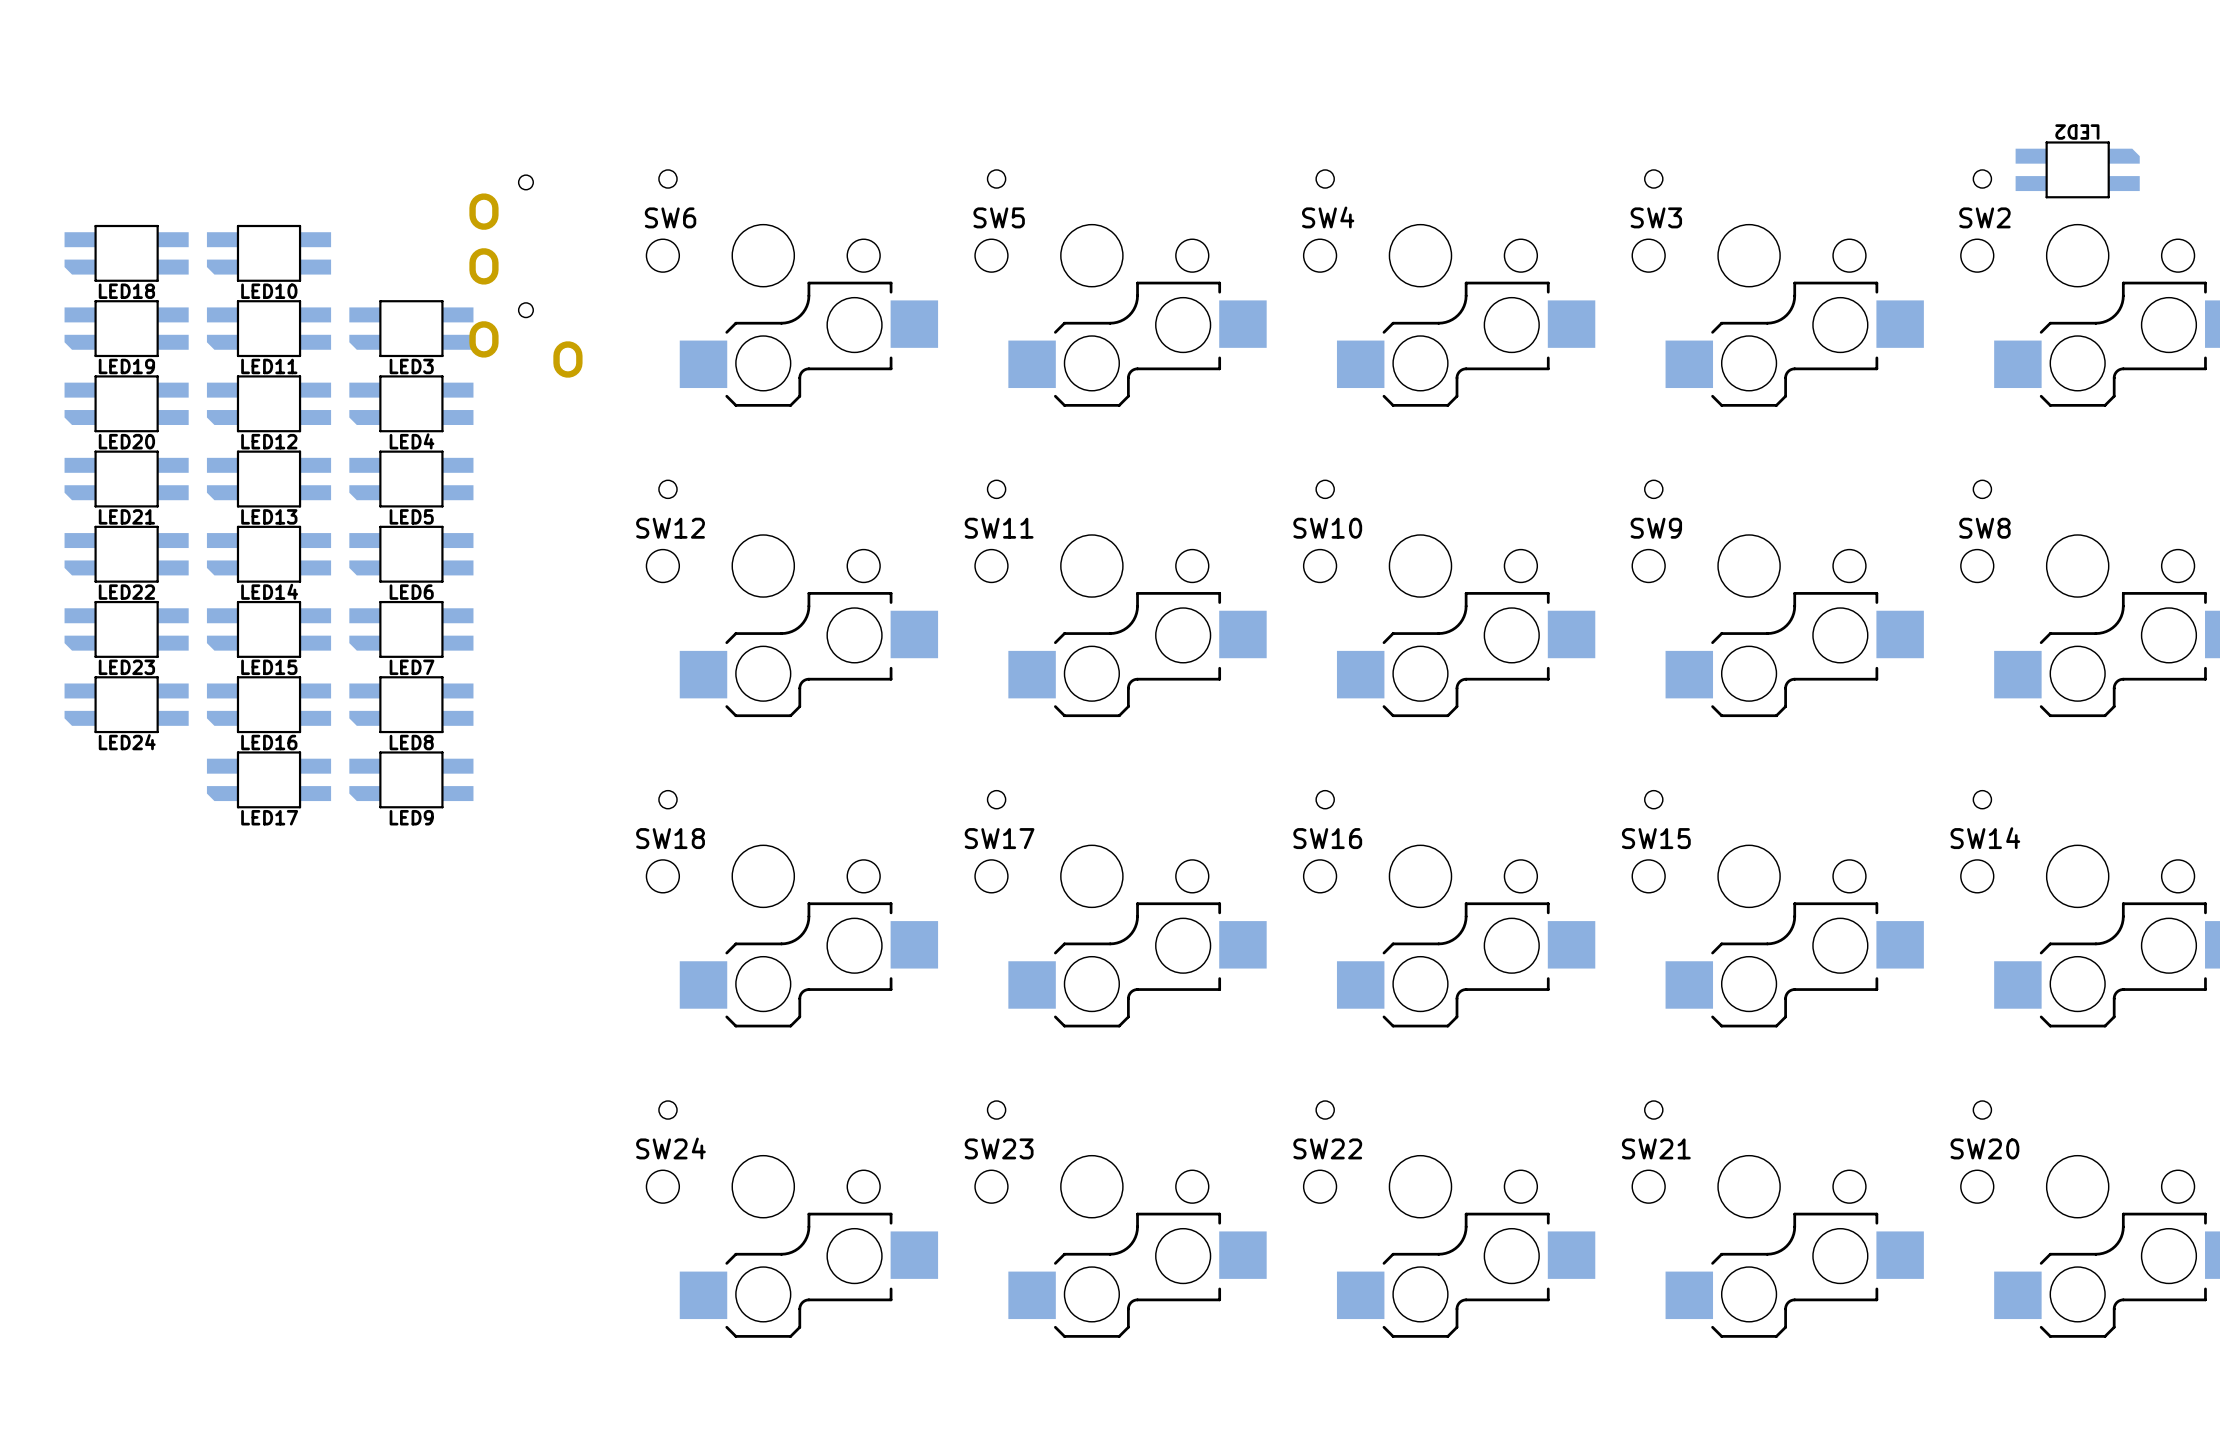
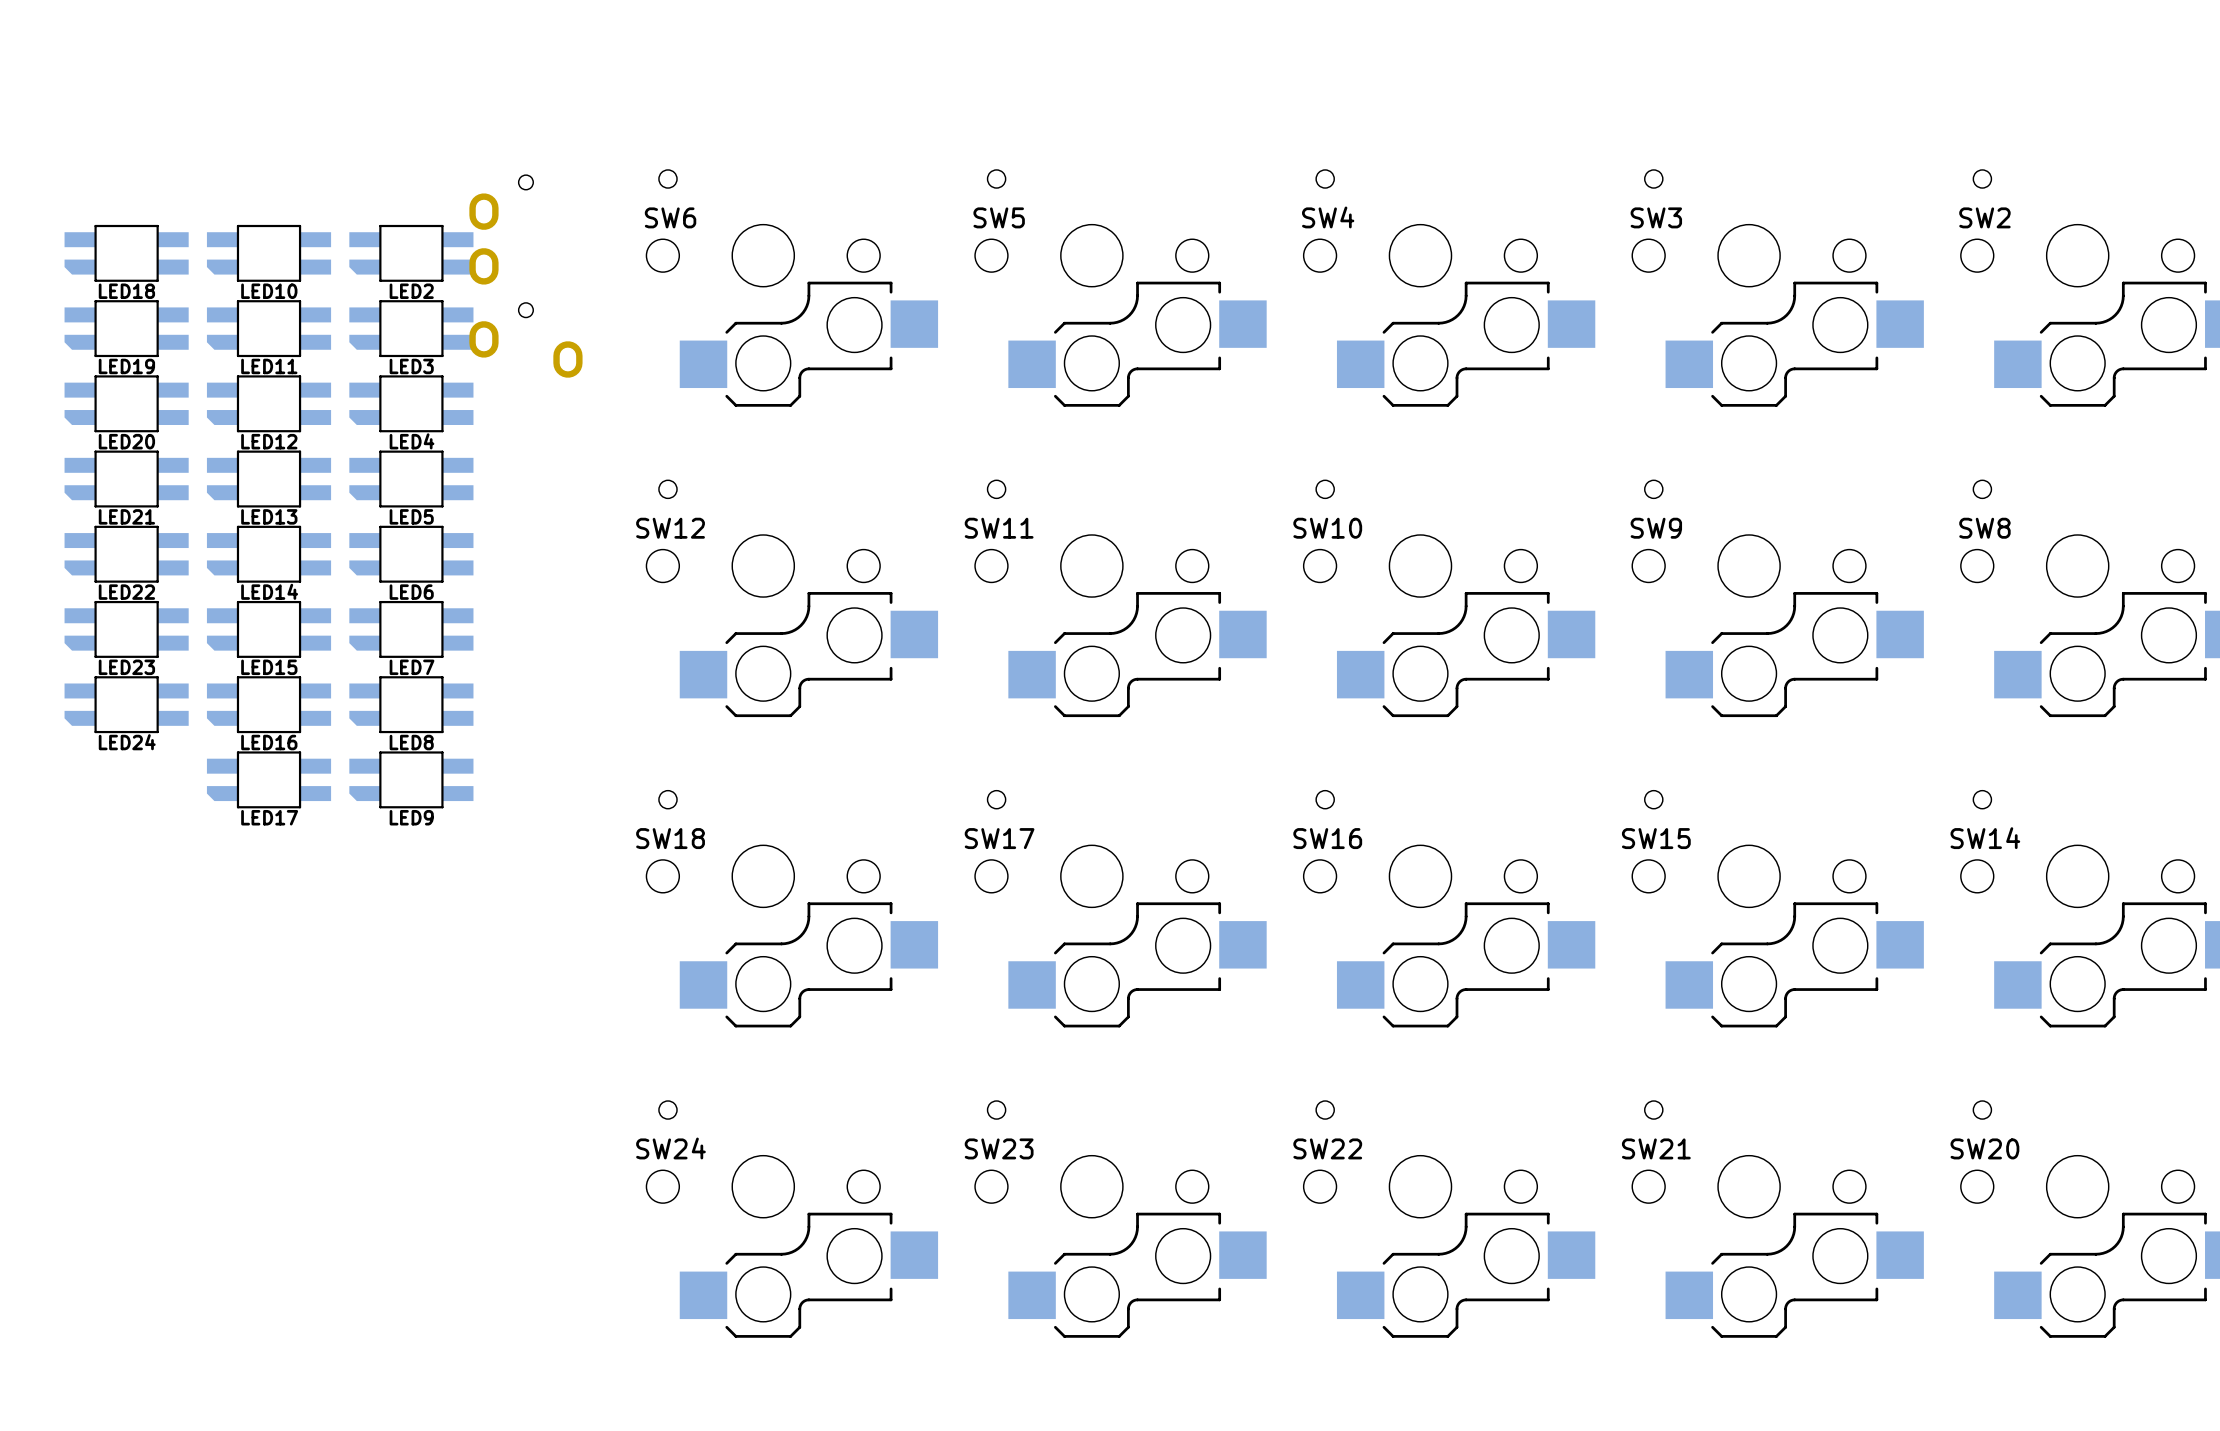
LED2 rotation: 0° (2077, 169) -> 180° (411, 253)
LED2 position: (2077, 169) -> (411, 253)

